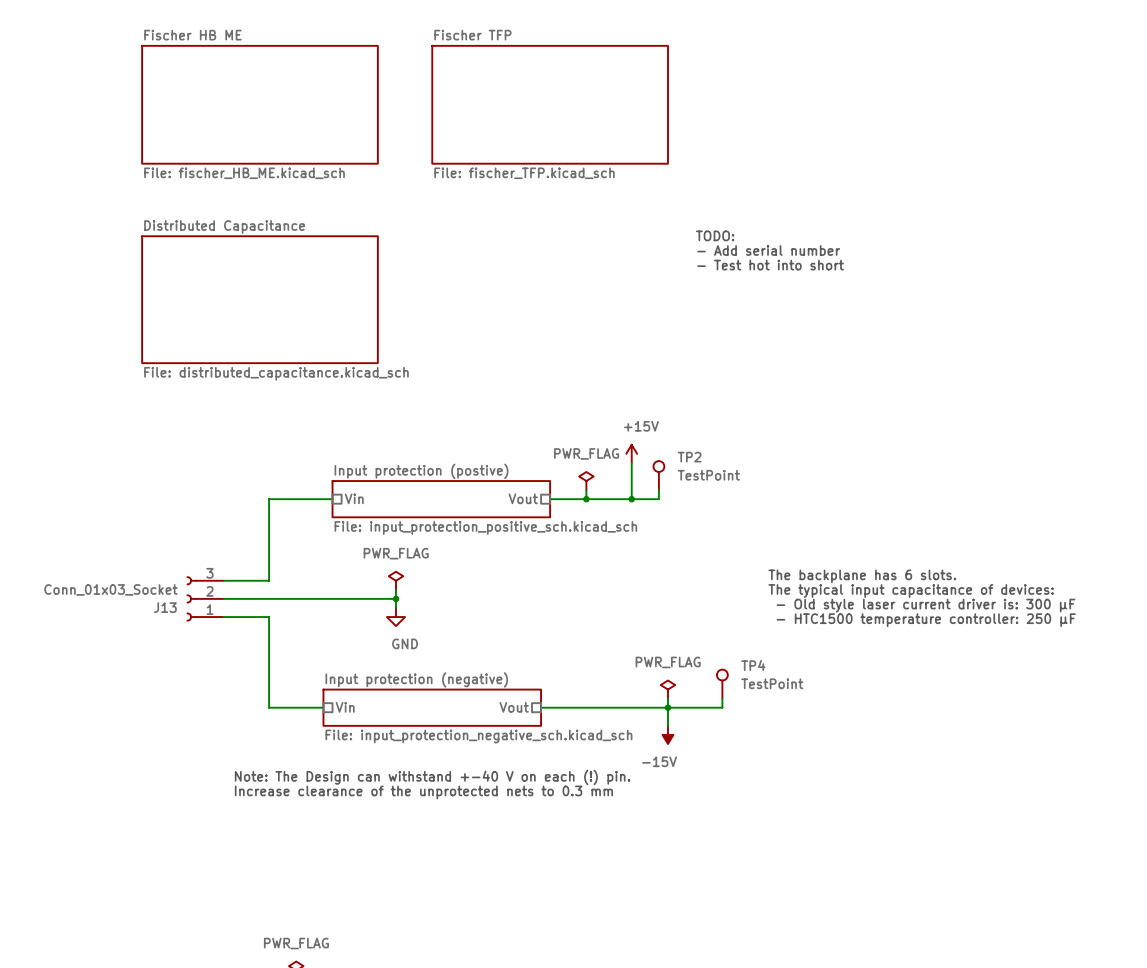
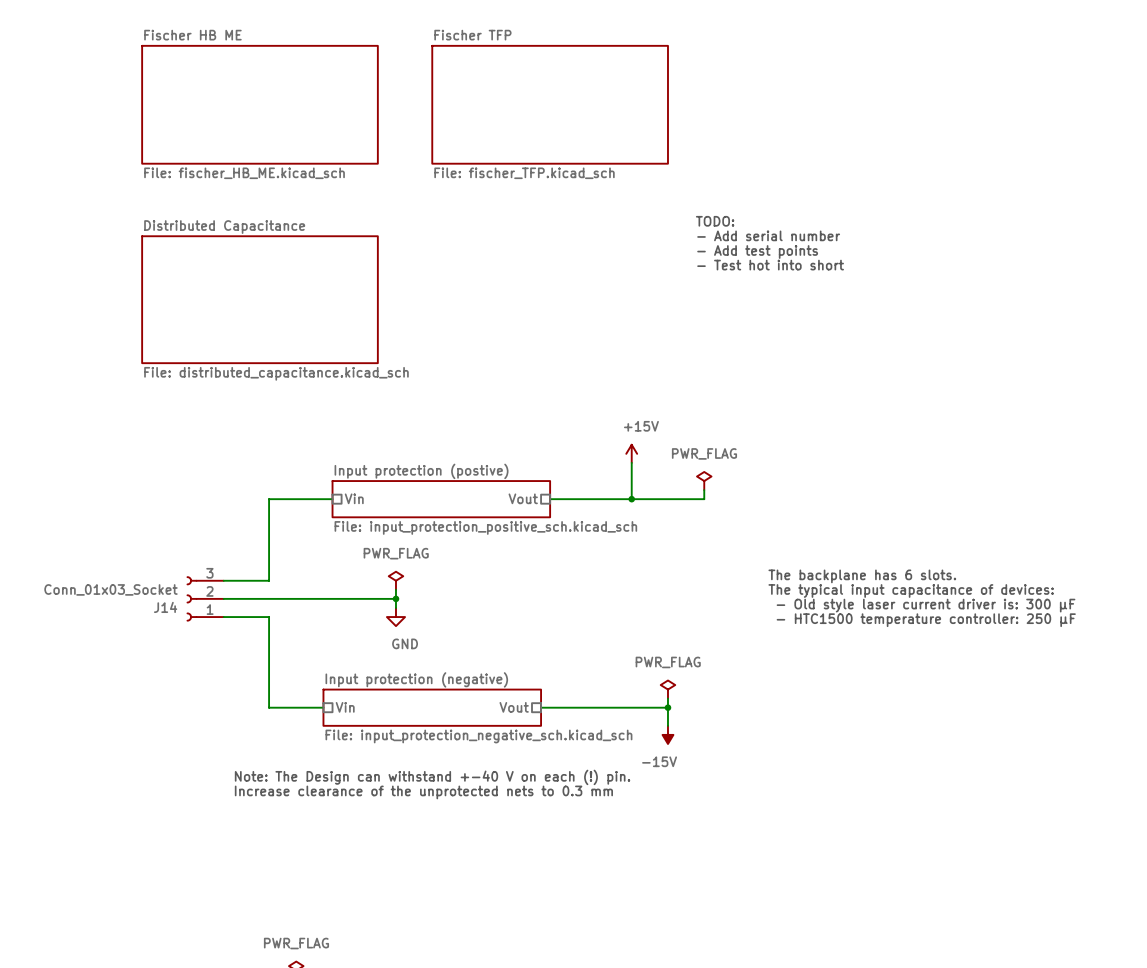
text: none -> TODO: (715, 221)
text: TODO: (715, 235) -> - Add serial number (768, 235)
text: - Add serial number (768, 250) -> - Add test points (757, 251)
TP2: TestPoint (658, 475) -> none
power symbol position: PWR_FLAG (586, 481) -> PWR_FLAG (704, 481)
wire: (586, 490) (586, 499) -> none
wire: (658, 490) (658, 499) -> (704, 490) (704, 499) (658, 499)
junction: (586, 499) -> none
J13 name: J13 (165, 607) -> J14 (165, 607)
TP4: TestPoint (722, 684) -> none
wire: (722, 698) (722, 707) (667, 707) -> none

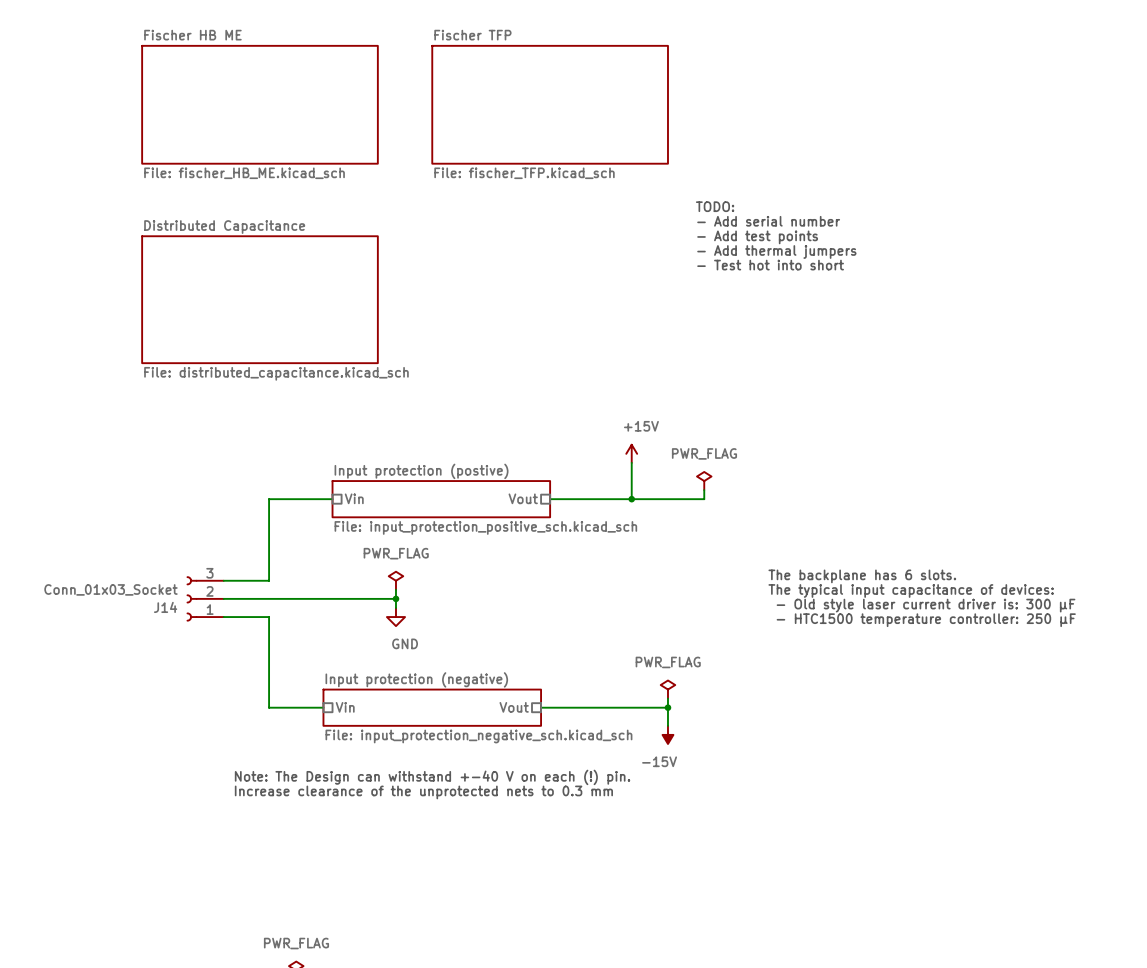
text: none -> TODO: (715, 206)
text: TODO: (715, 221) -> - Add serial number (768, 221)
text: - Add serial number (768, 235) -> - Add test points (757, 237)
text: - Add test points (757, 251) -> - Add thermal jumpers (776, 251)

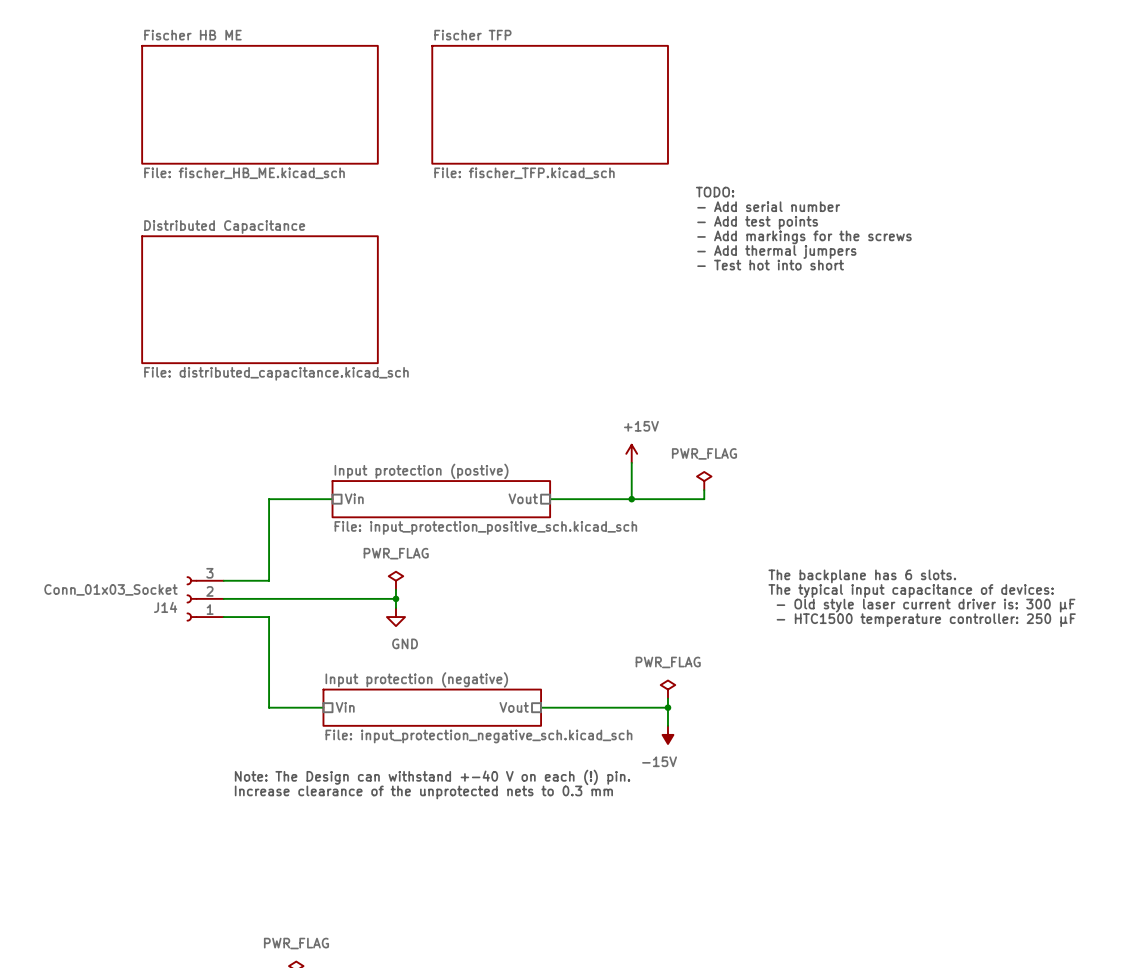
text: none -> TODO: (715, 192)
text: TODO: (715, 206) -> - Add serial number (768, 206)
text: - Add serial number (768, 221) -> - Add test points (757, 222)
text: - Add test points (757, 237) -> - Add markings for the screws (804, 237)

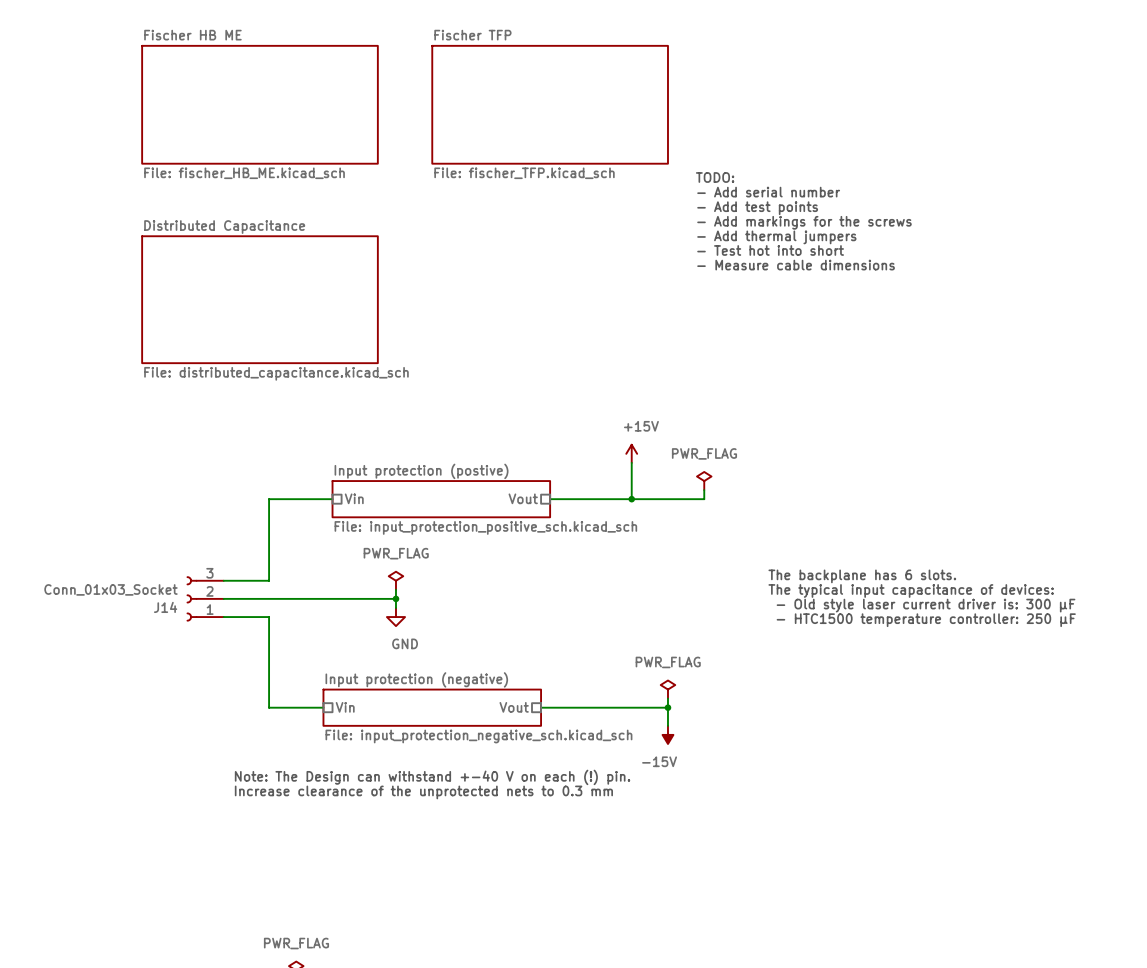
text: none -> TODO: (715, 177)
text: TODO: (715, 192) -> - Add serial number (768, 192)
text: - Add serial number (768, 206) -> - Add test points (757, 208)
text: - Add test points (757, 222) -> - Add markings for the screws (804, 222)
text: - Add markings for the screws (804, 237) -> - Add thermal jumpers (776, 237)
text: - Add thermal jumpers (776, 251) -> - Test hot into short (770, 250)
text: - Test hot into short (770, 265) -> - Measure cable dimensions (796, 265)

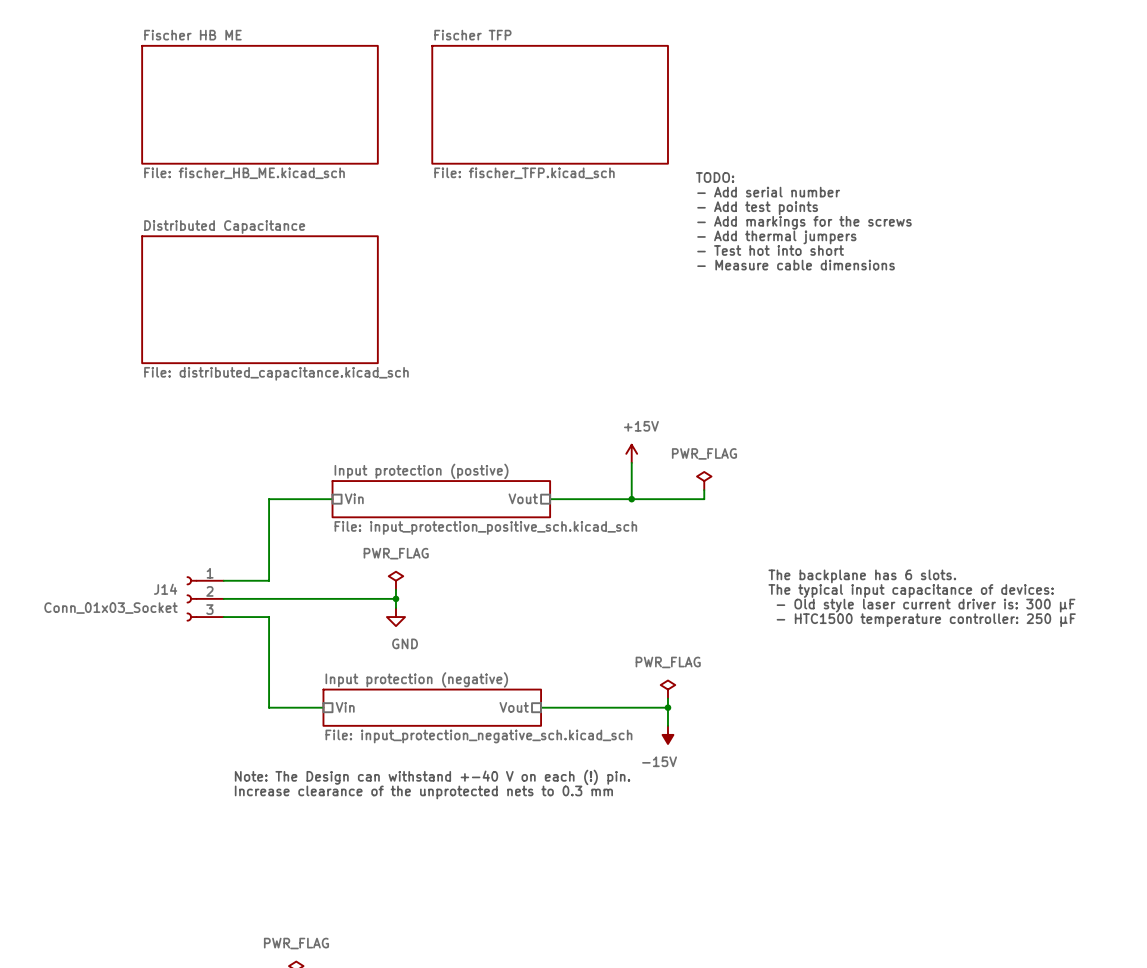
J14 flip: as is (191, 598) -> up-down (191, 598)

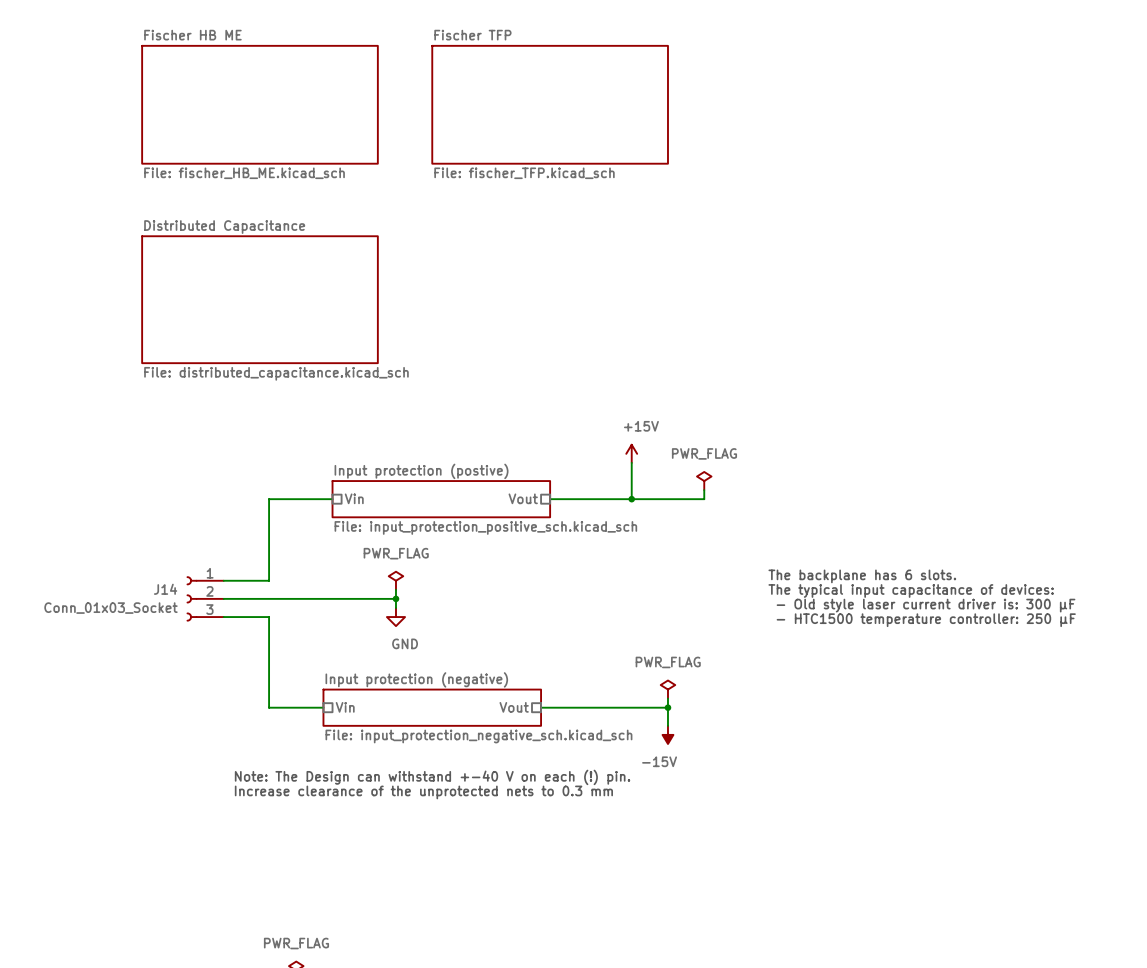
text: TODO: (715, 177) -> none
text: - Add serial number (768, 192) -> none
text: - Add test points (757, 208) -> none
text: - Add markings for the screws (804, 222) -> none
text: - Add thermal jumpers (776, 237) -> none
text: - Test hot into short (770, 250) -> none
text: - Measure cable dimensions (796, 265) -> none

